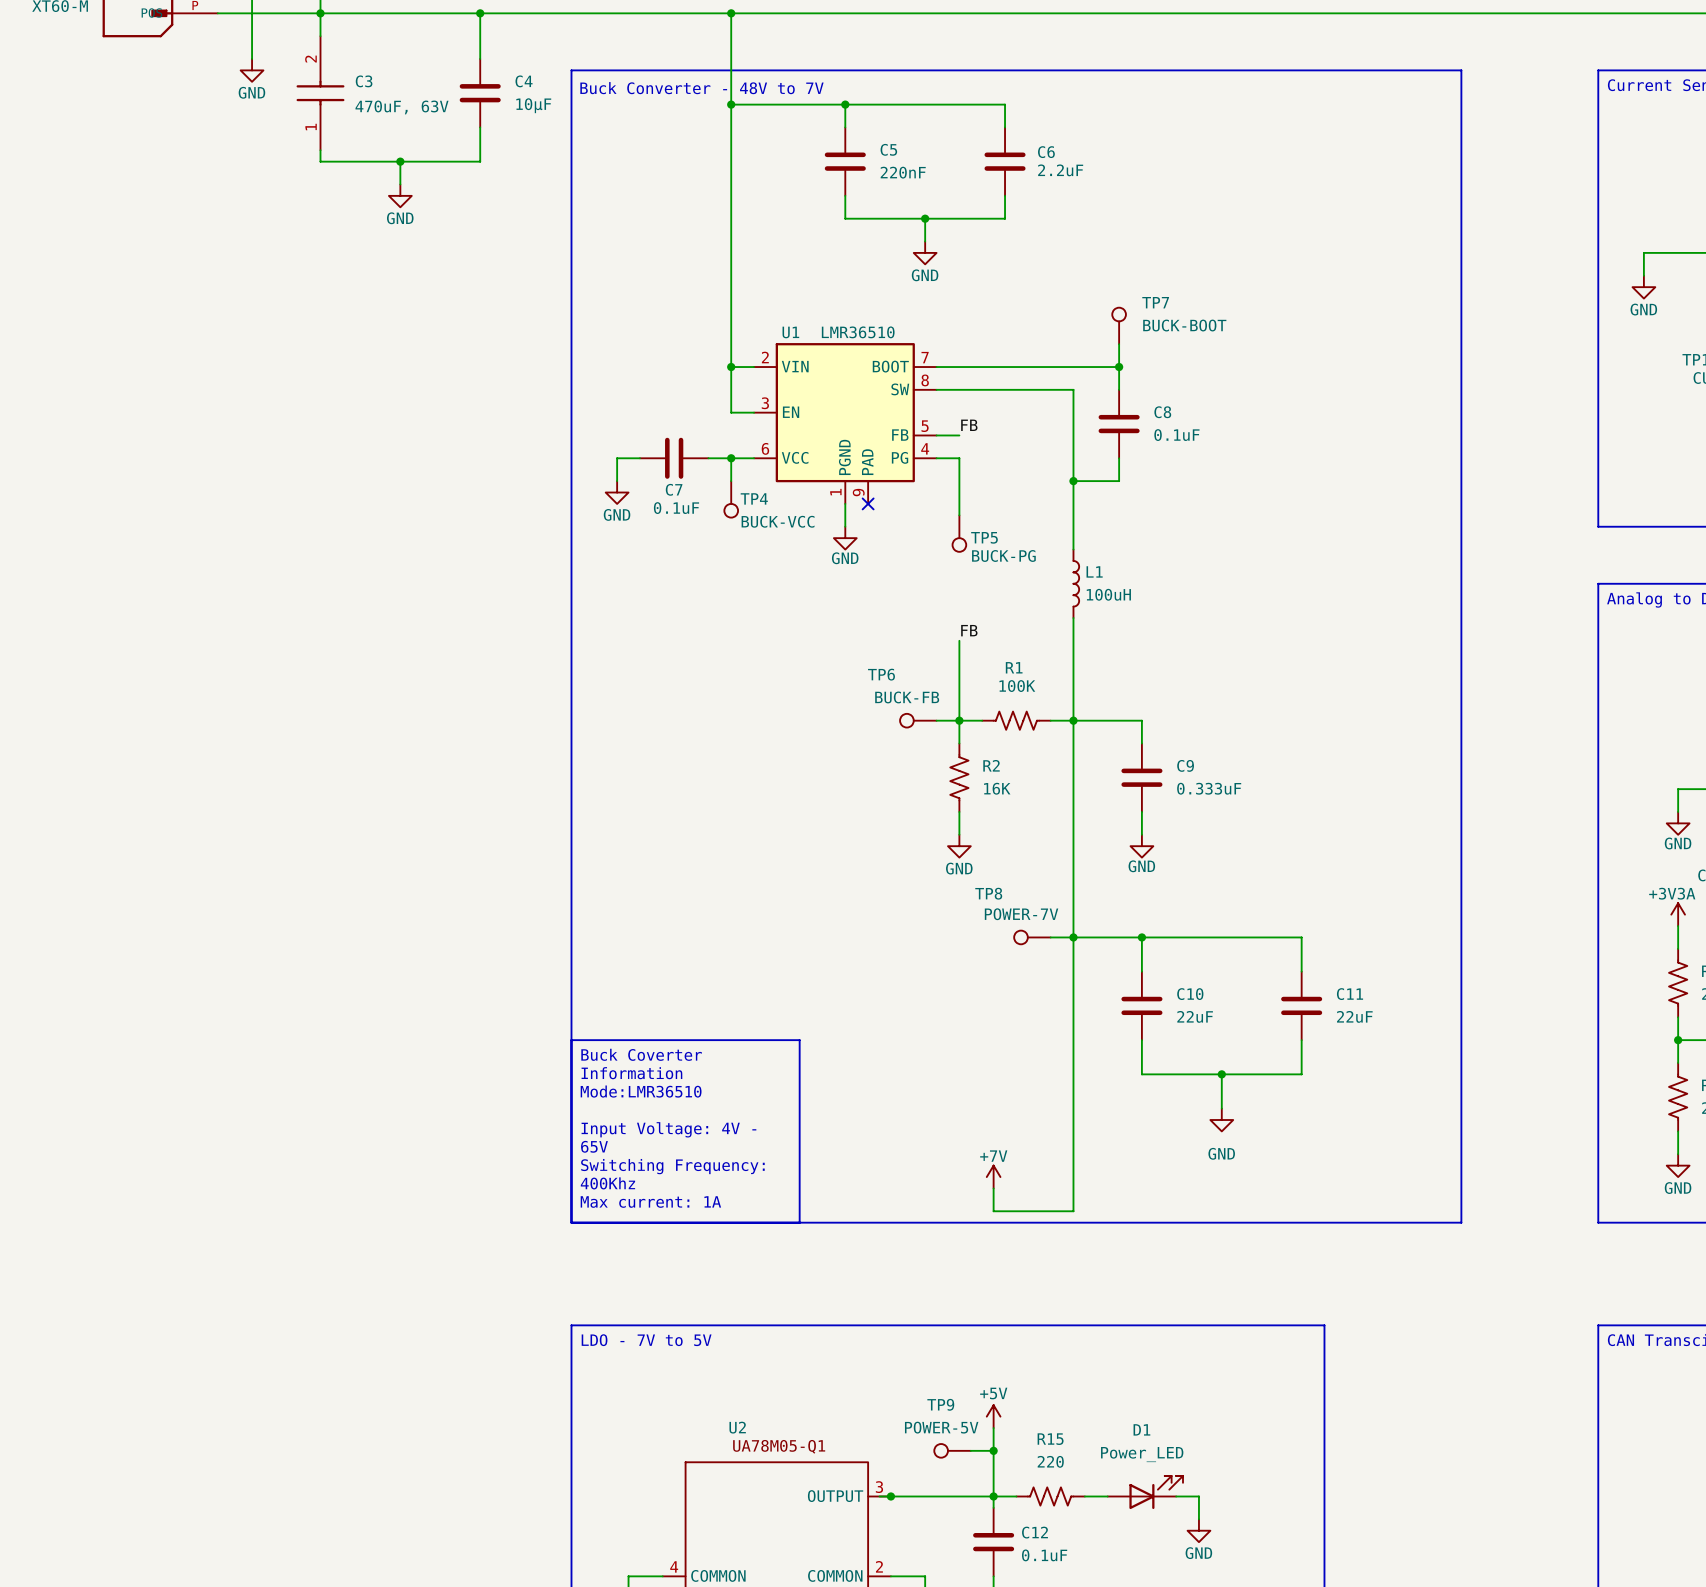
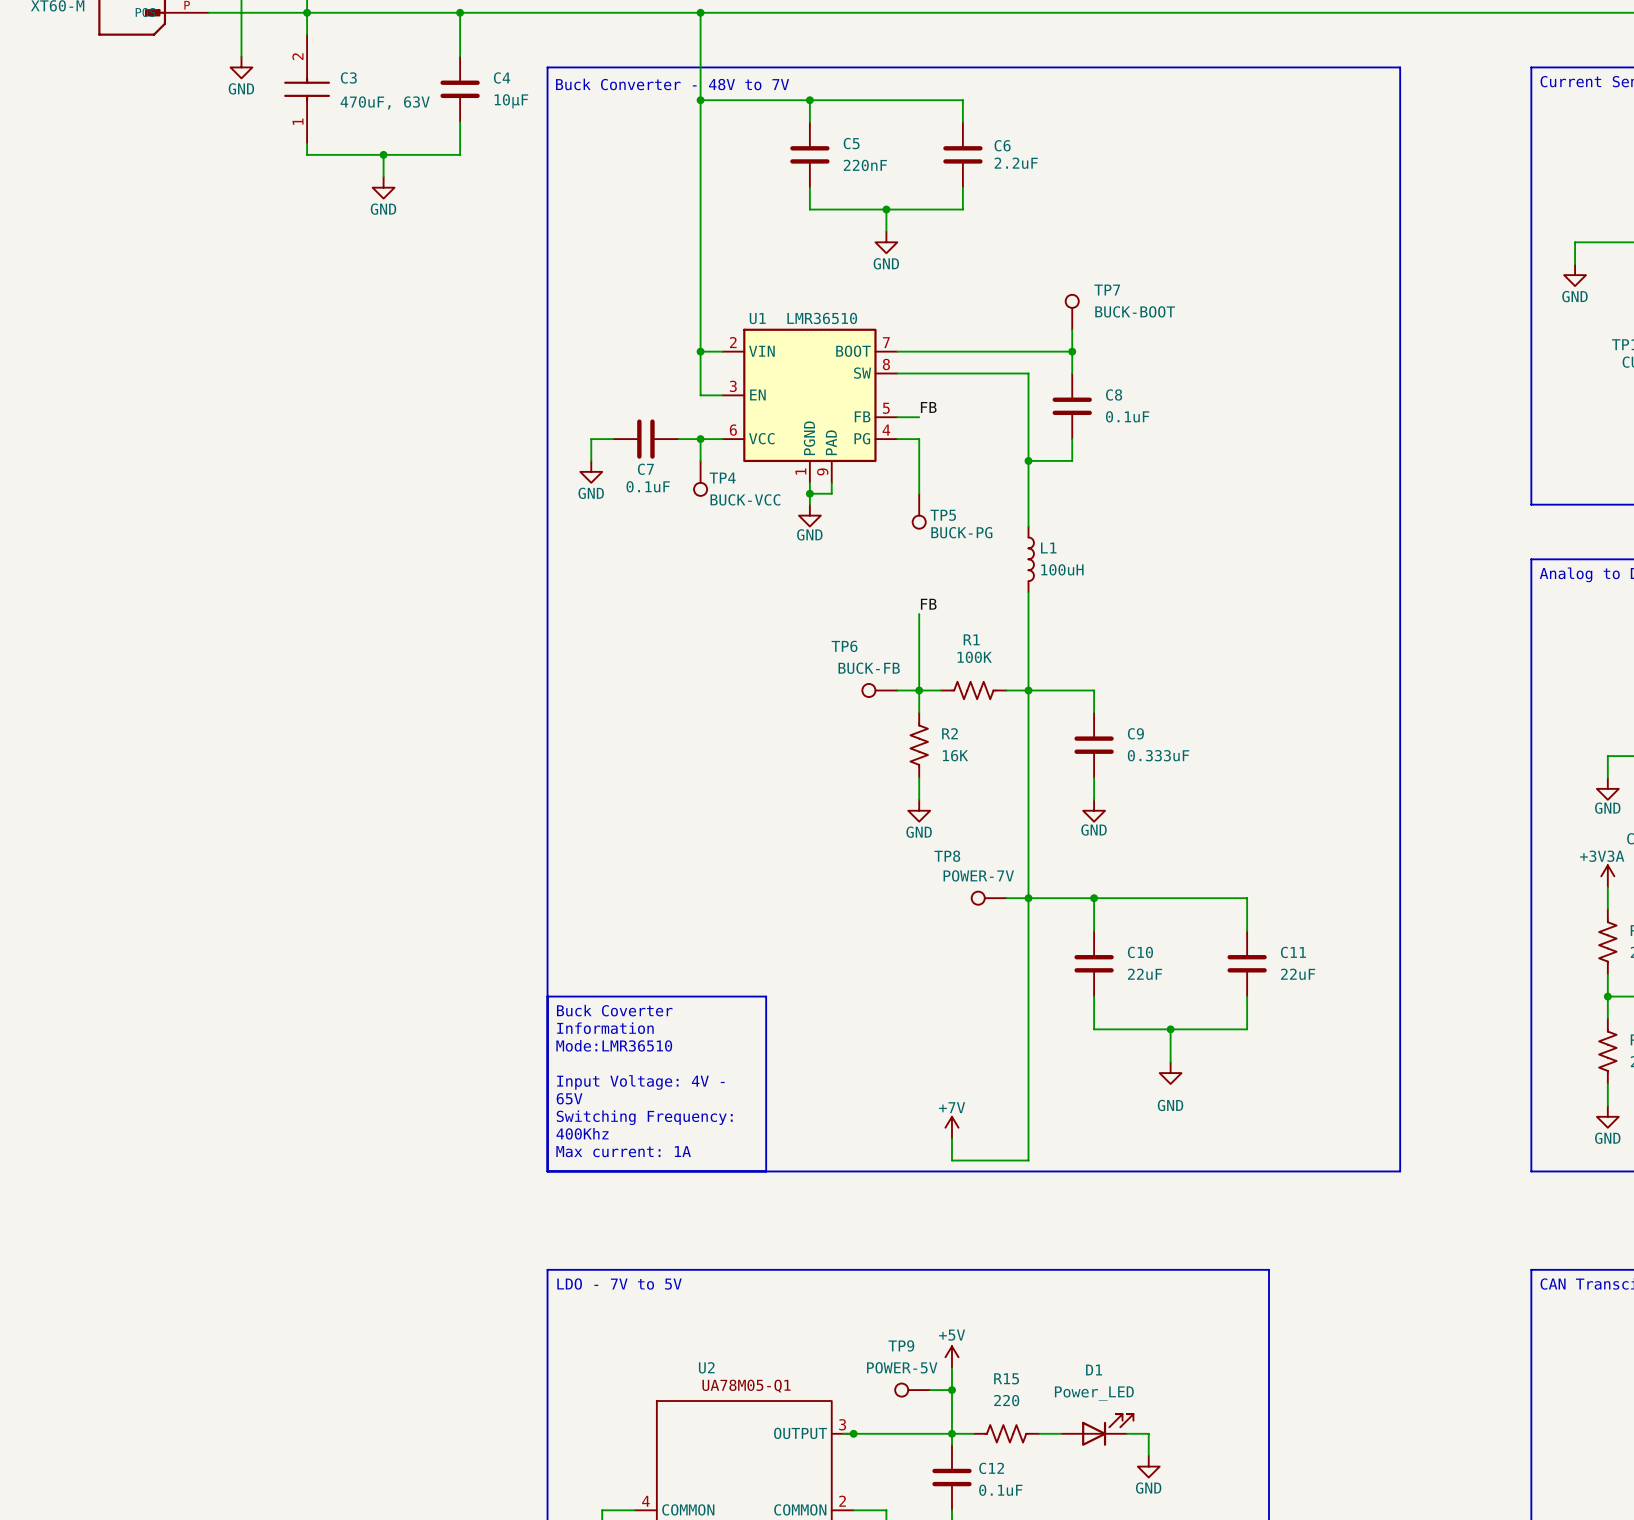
wire: none -> (831, 482) (831, 493) (809, 493)
no-connect mark: (868, 503) -> none
junction: none -> (809, 493)

